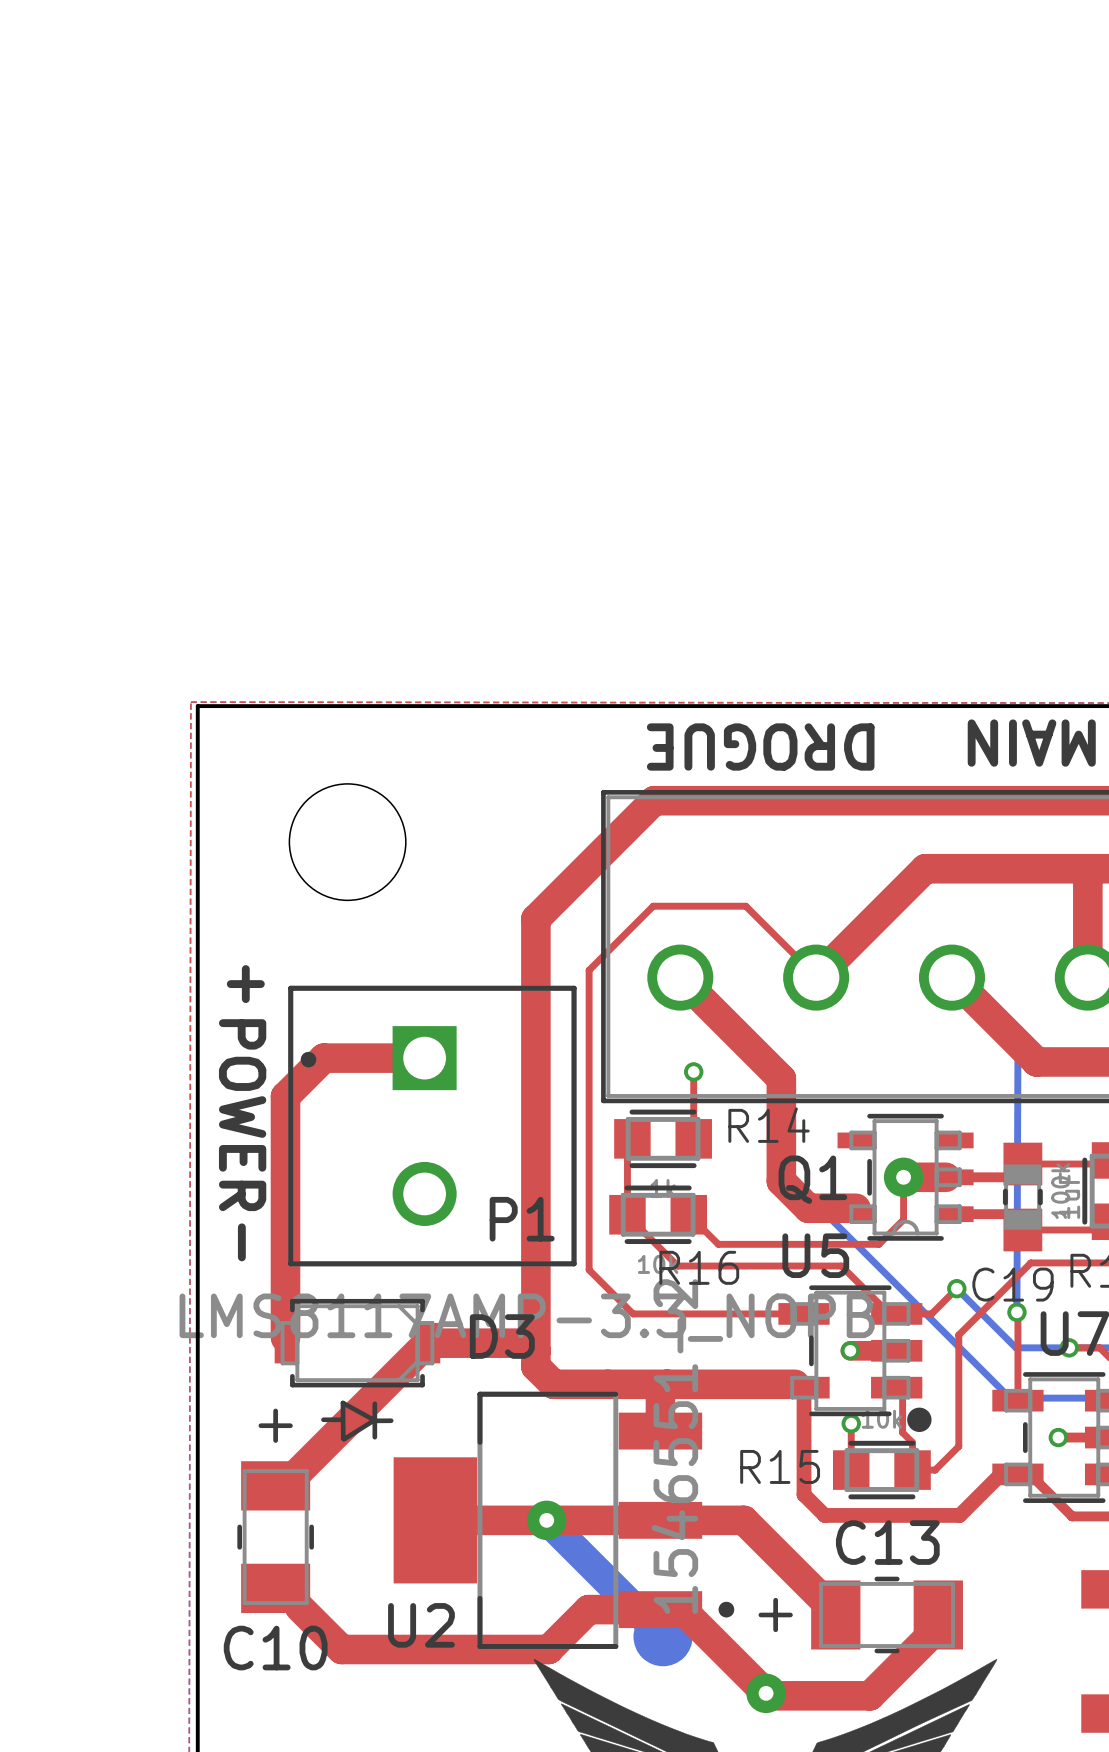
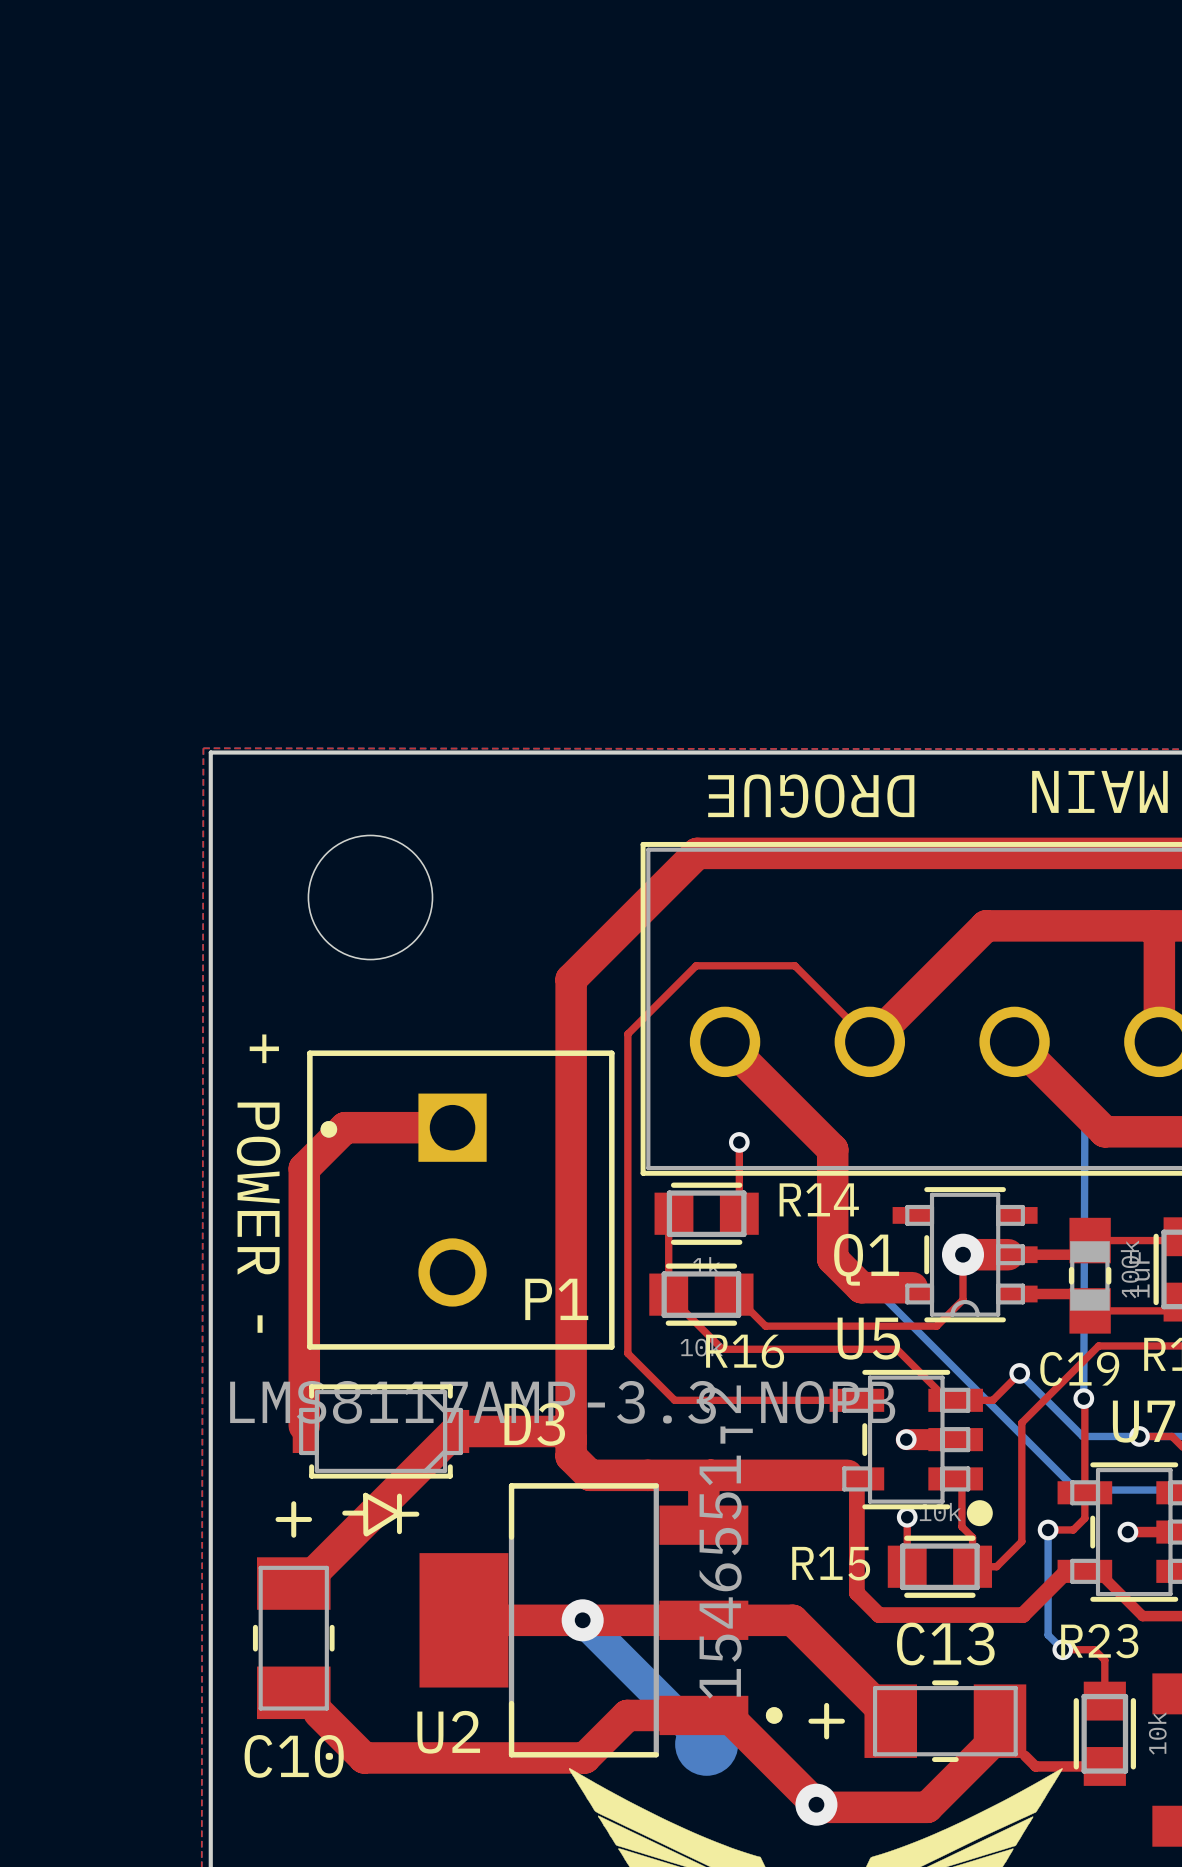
top track: none -> (1084, 1492) (1084, 1518) (1073, 1529) (1048, 1529)
bottom track: none -> (1048, 1529) (1048, 1635) (1062, 1649)
via: none -> (1048, 1529)
top track: none -> (1062, 1649) (1094, 1649) (1104, 1660) (1104, 1697)
via: none -> (1062, 1649)
R23: none -> 10k (1104, 1733)
top track: none -> (1024, 1755) (1035, 1766) (1104, 1766)

